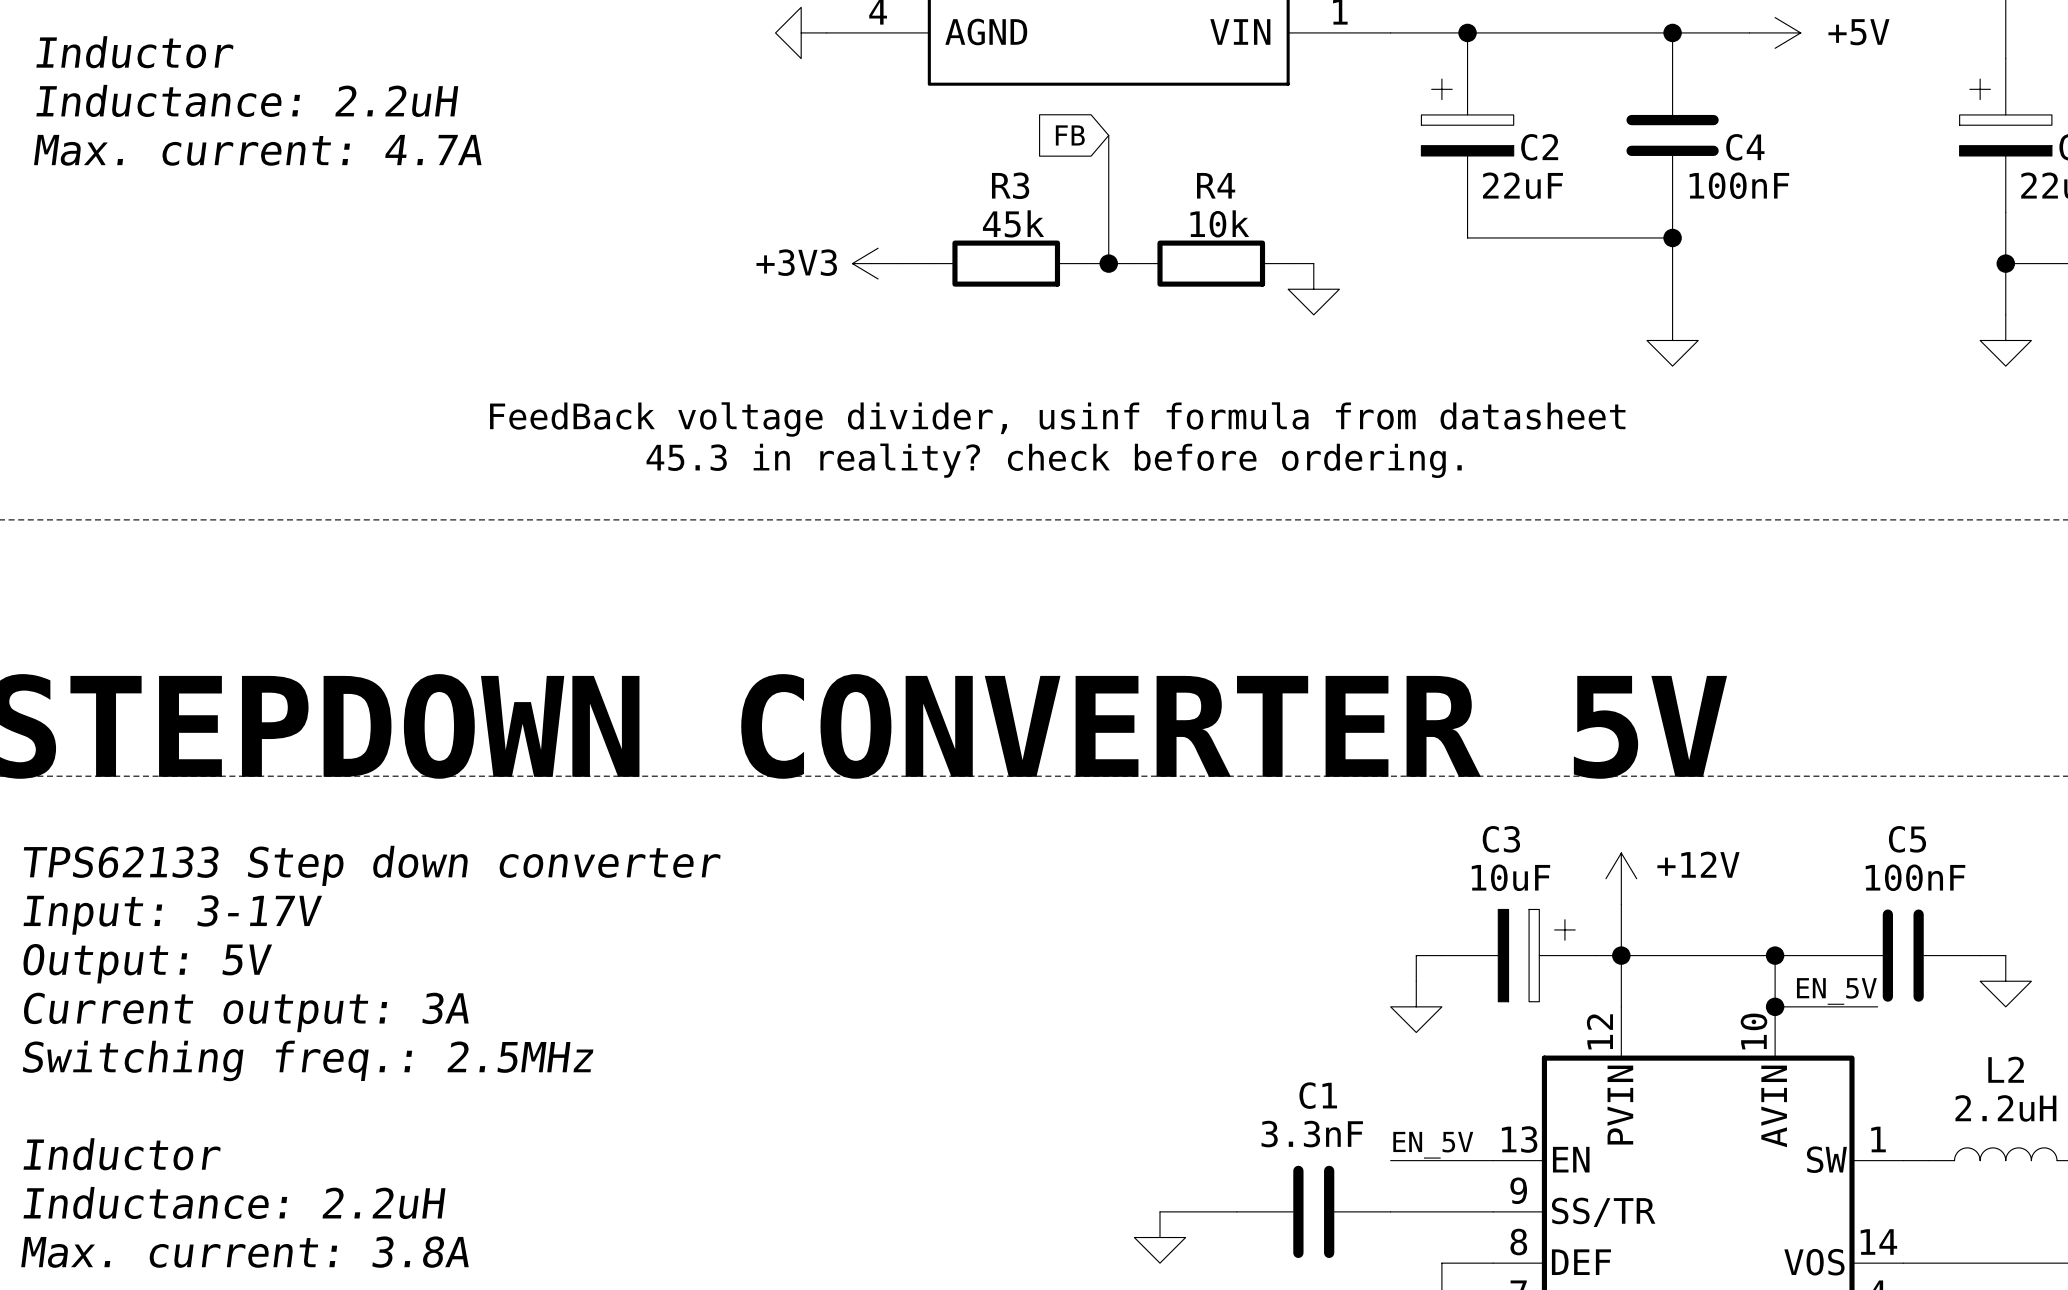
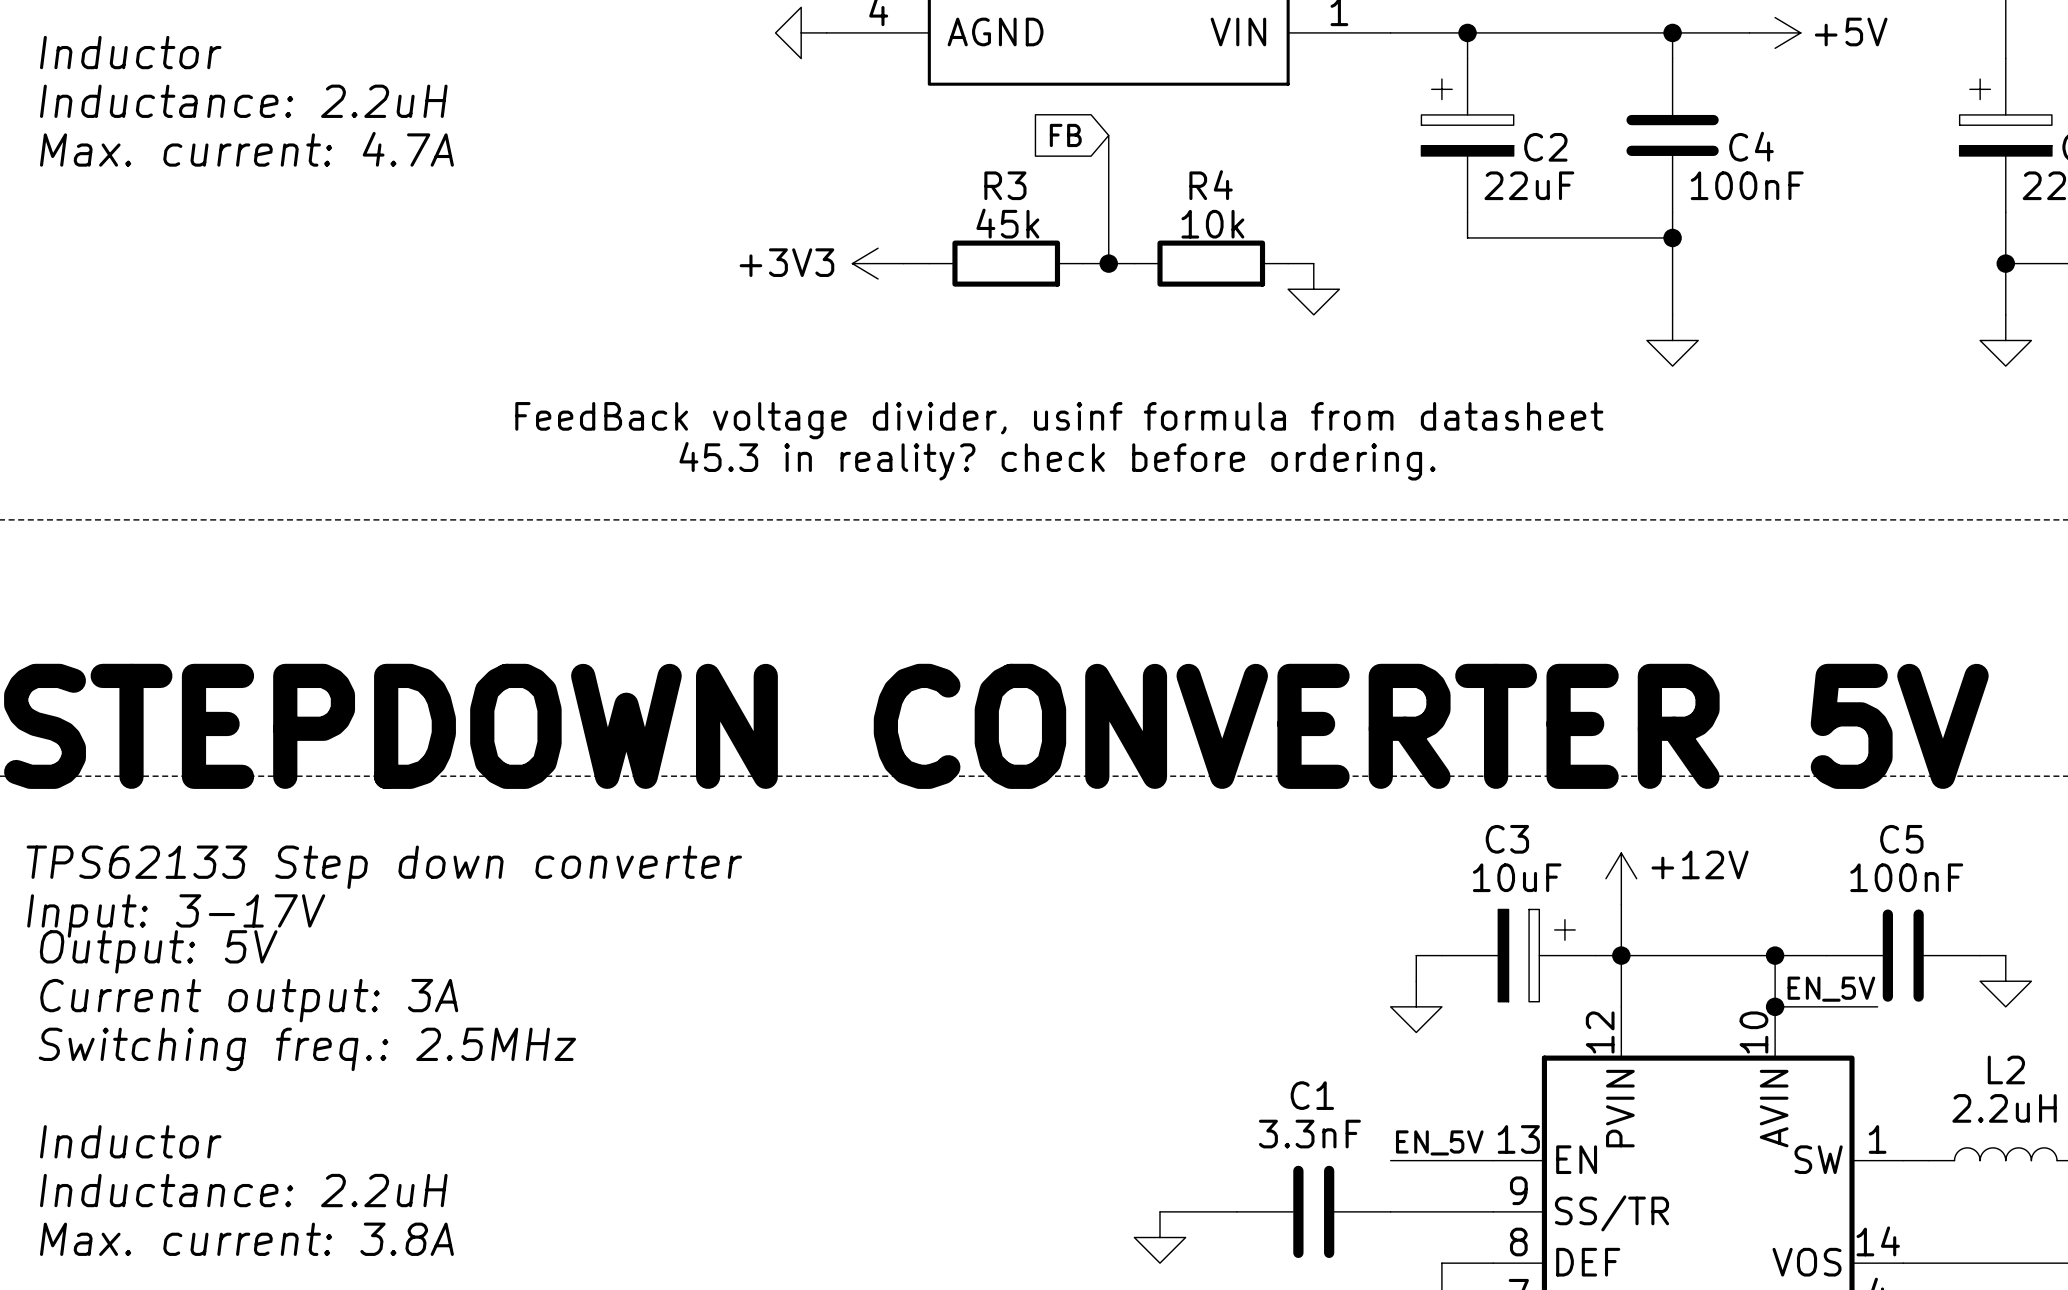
text position: Output: 5V (147, 963) -> Output: 5V (158, 951)
text position: Current output: 3A (245, 1012) -> Current output: 3A (249, 1000)
text position: Switching freq.: 2.5MHz (308, 1060) -> Switching freq.: 2.5MHz (307, 1049)
text position: Inductor (122, 1154) -> Inductor (130, 1141)
text position: Inductance: 2.2uH (234, 1203) -> Inductance: 2.2uH (243, 1190)
text position: Max. current: 3.8A (244, 1252) -> Max. current: 3.8A (246, 1239)

